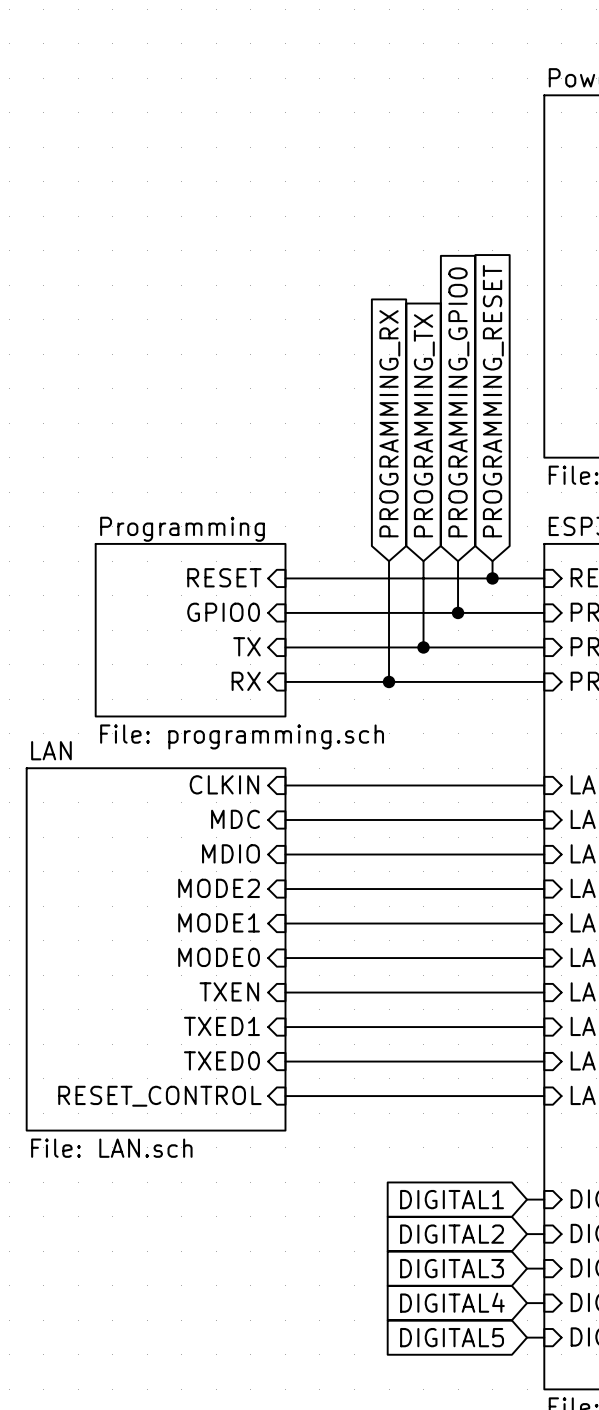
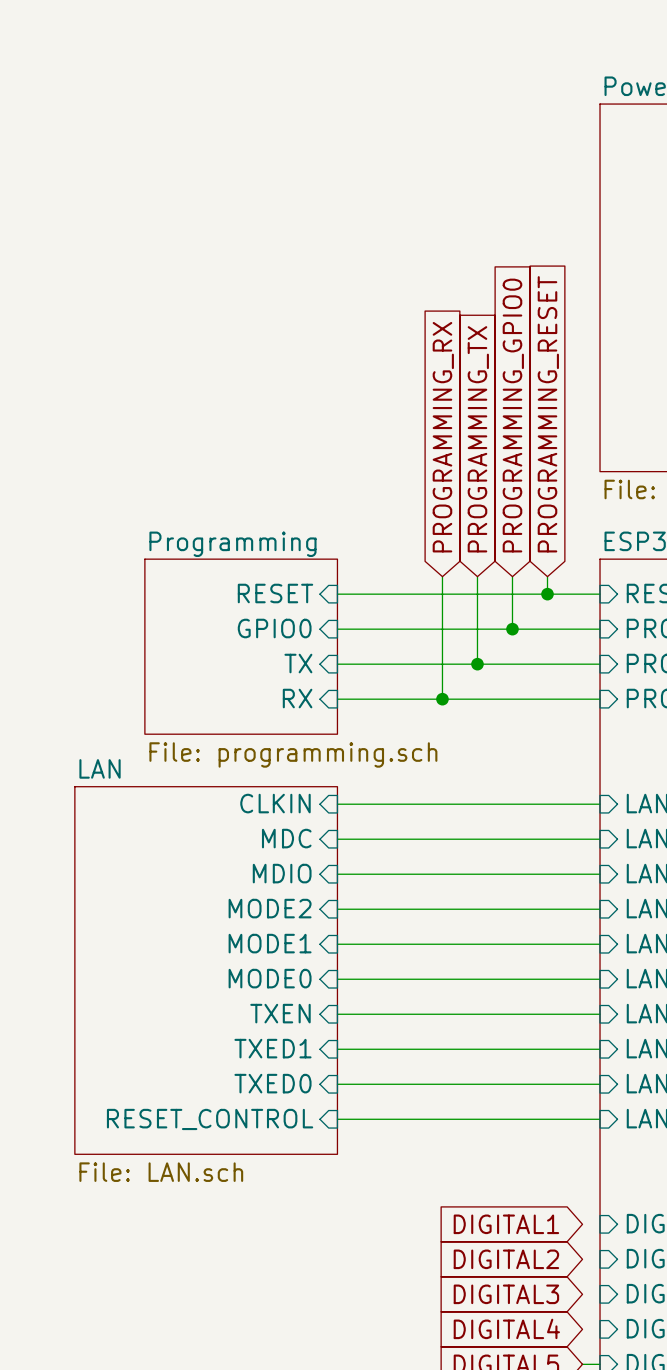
wire: (527, 1199) (544, 1199) -> none
wire: (527, 1234) (544, 1234) -> none
wire: (527, 1268) (544, 1268) -> none
wire: (527, 1303) (544, 1303) -> none

